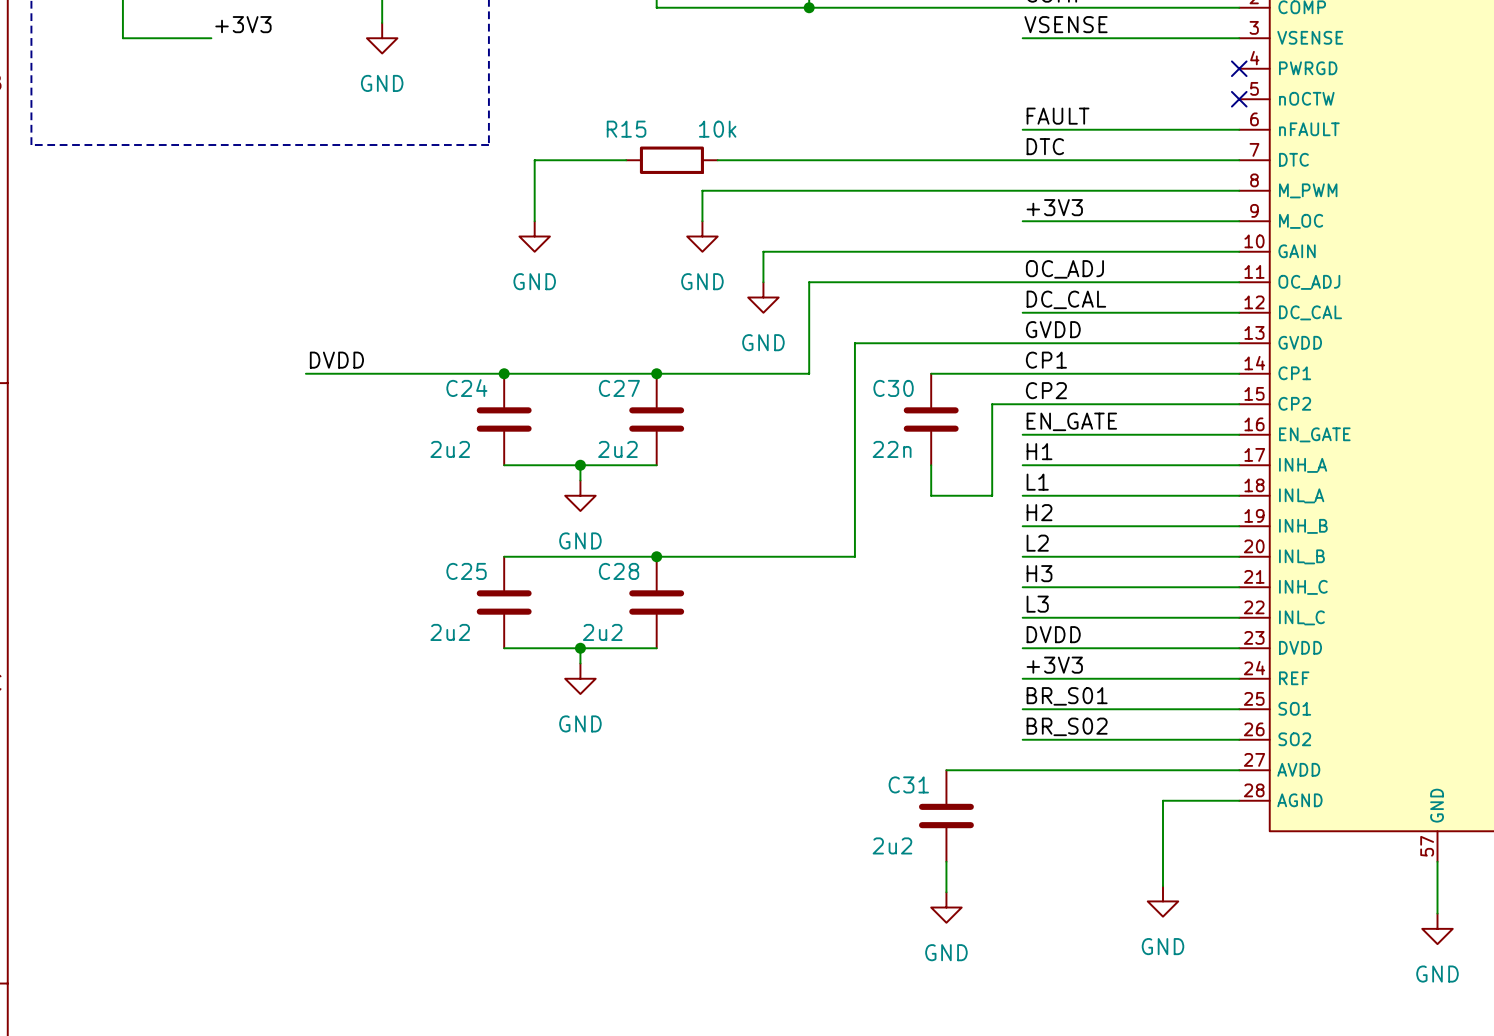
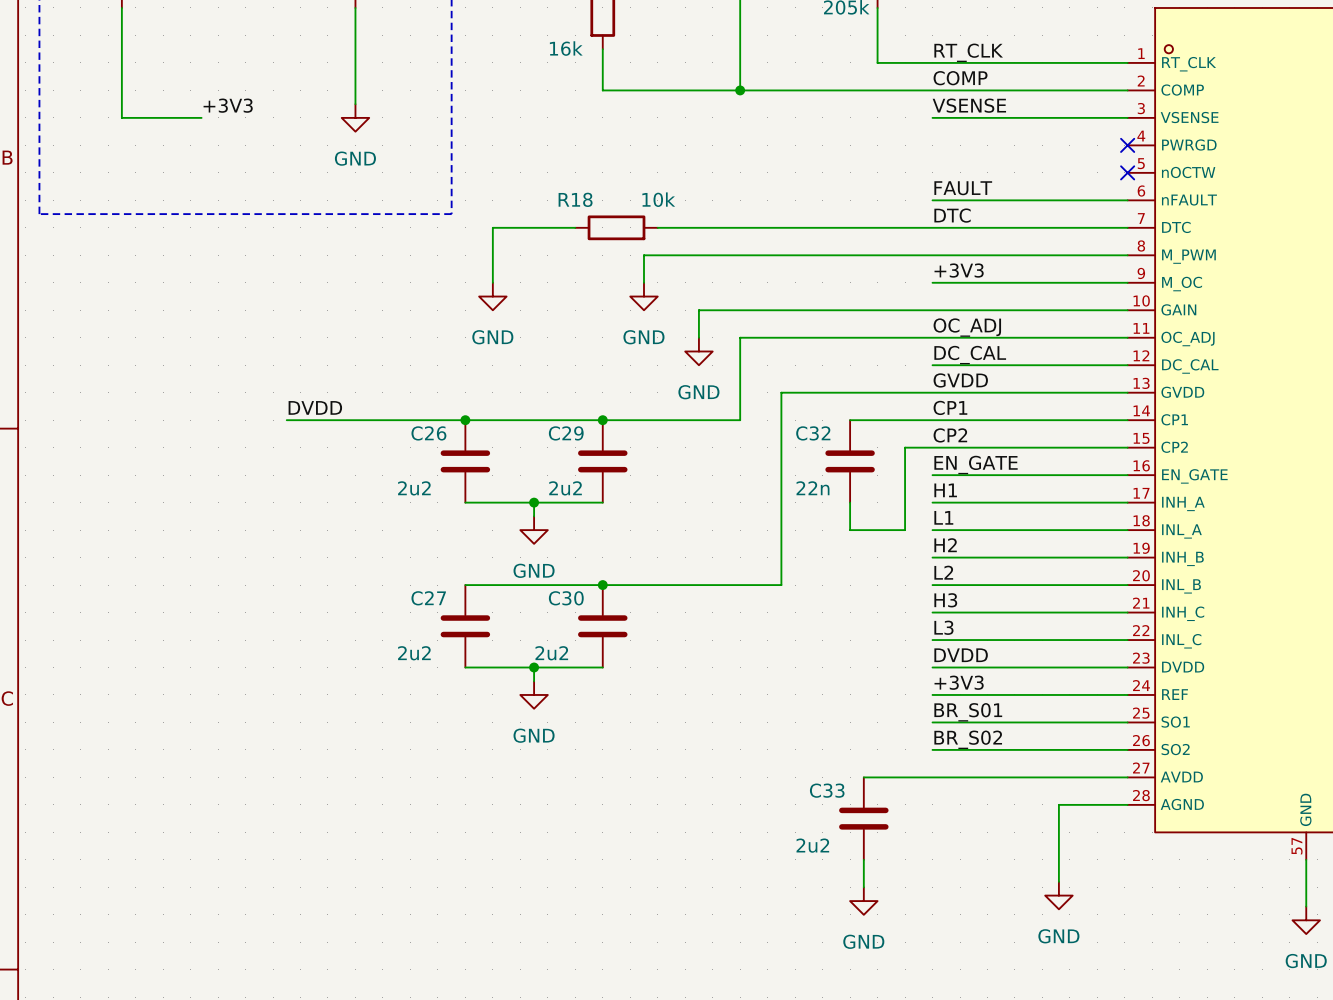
R15 name: R15 (626, 129) -> R18 (575, 199)
C24 name: C24 (466, 388) -> C26 (428, 433)
C27 name: C27 (619, 388) -> C29 (566, 433)
C30 name: C30 (893, 388) -> C32 (813, 433)
C25 name: C25 (466, 571) -> C27 (428, 598)
C28 name: C28 (619, 571) -> C30 (566, 598)
C31 name: C31 (908, 784) -> C33 (827, 790)

